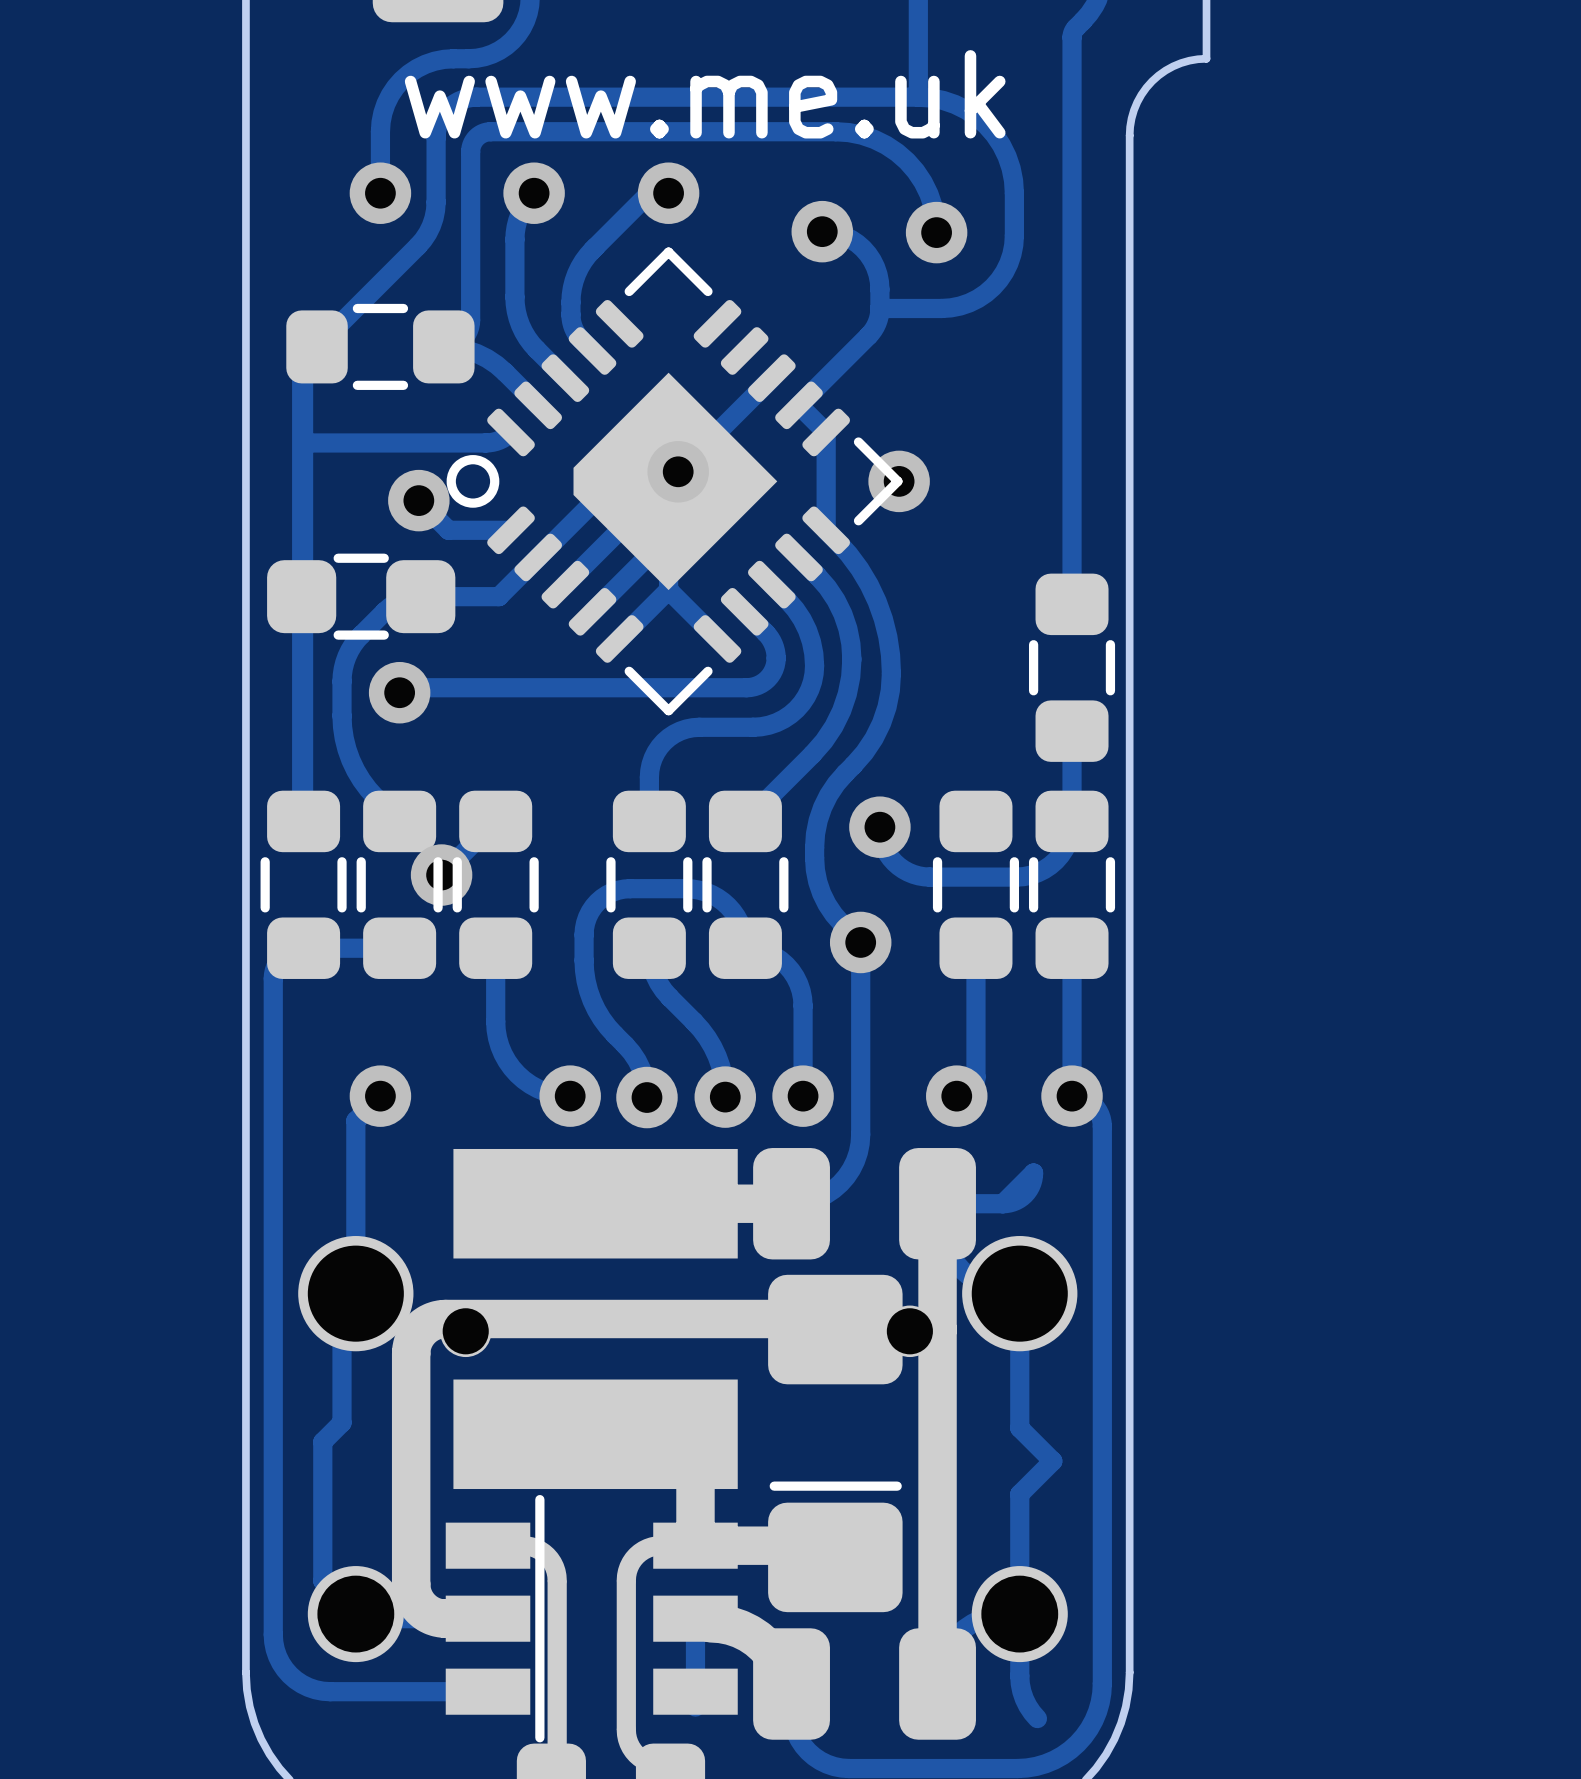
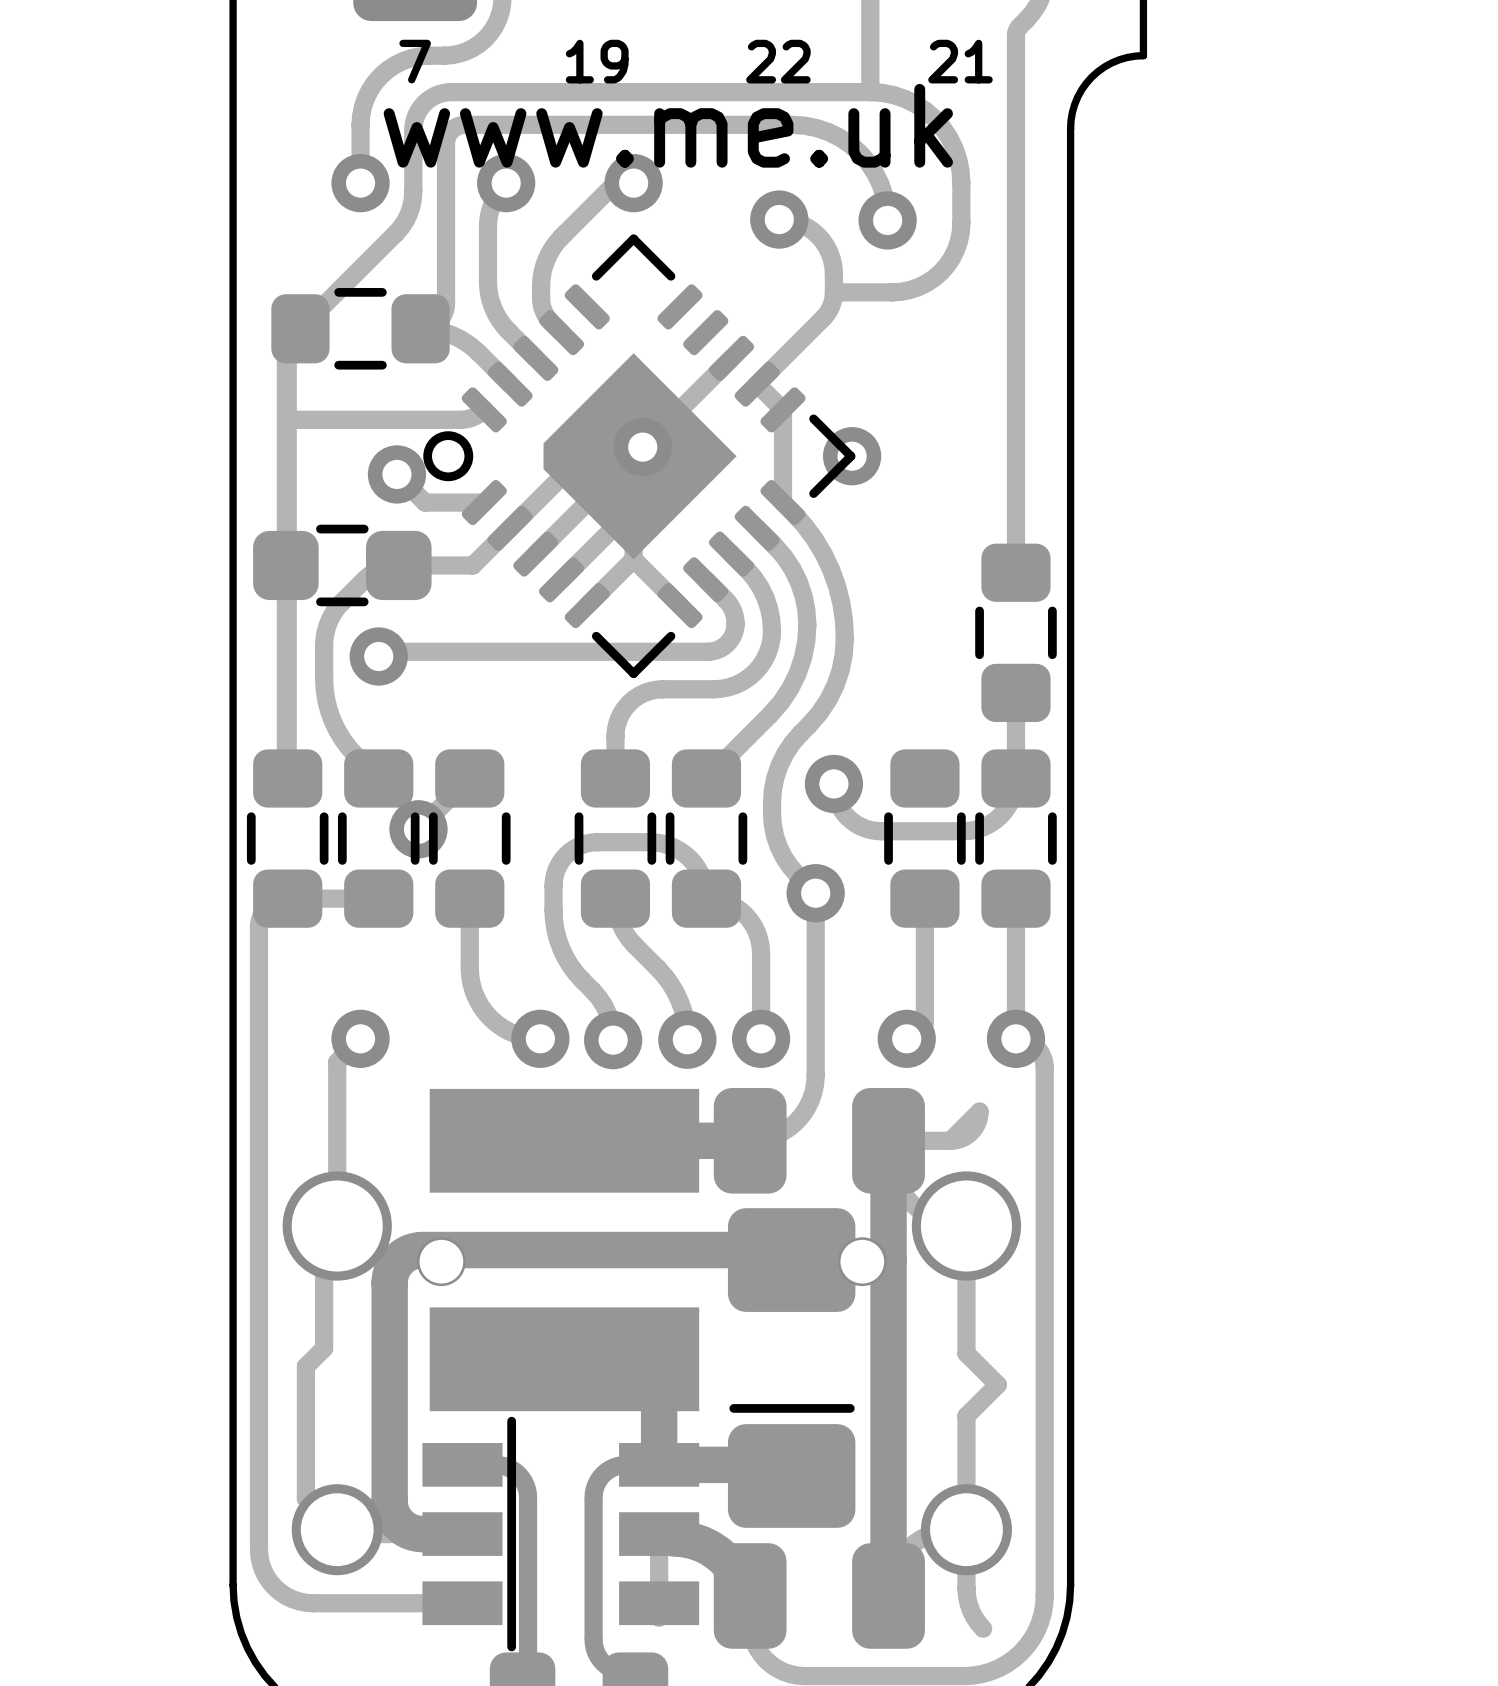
text: none -> 7 (415, 61)
text: none -> 19 (597, 61)
text: none -> 22 (778, 61)
text: none -> 21 (960, 61)
text position: www.me.uk (705, 94) -> www.me.uk (668, 125)

